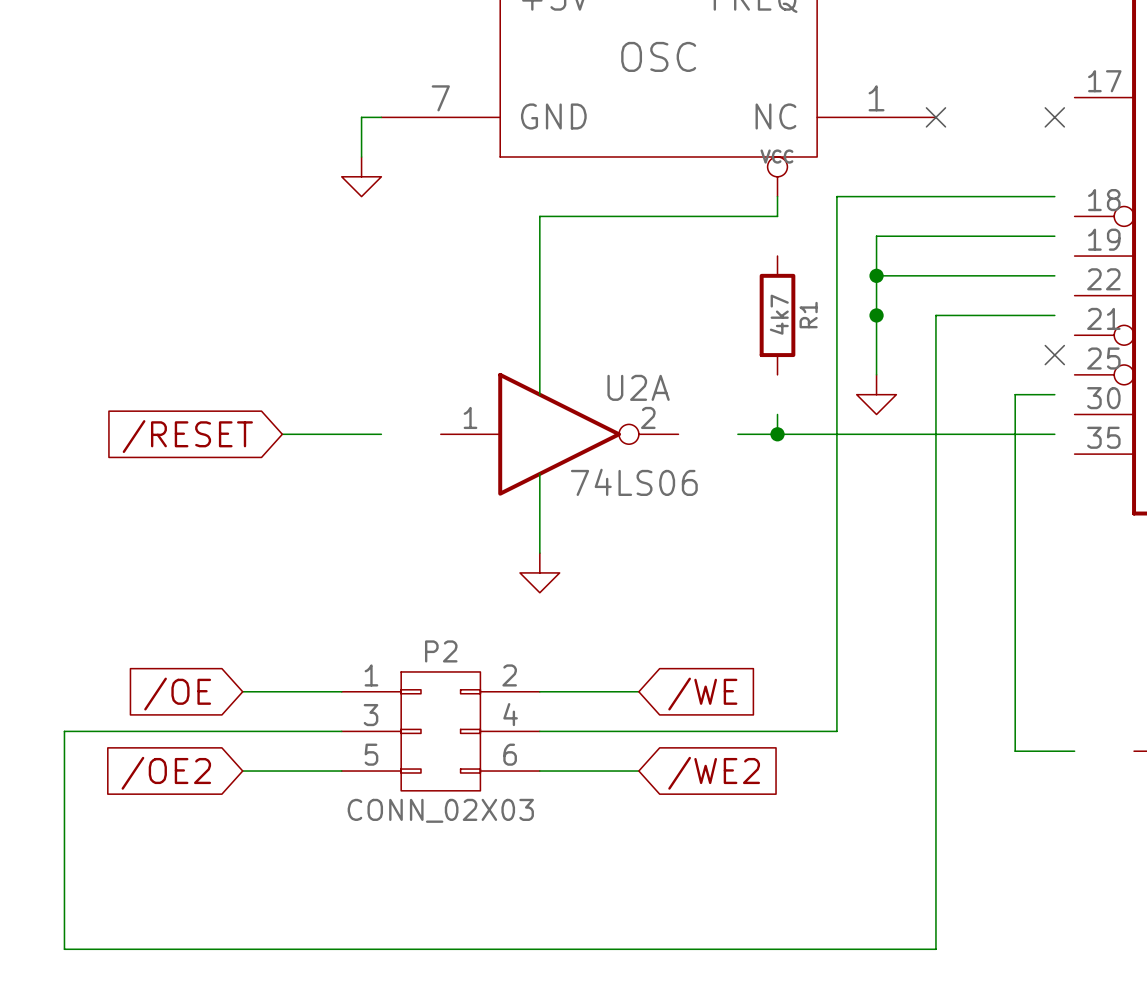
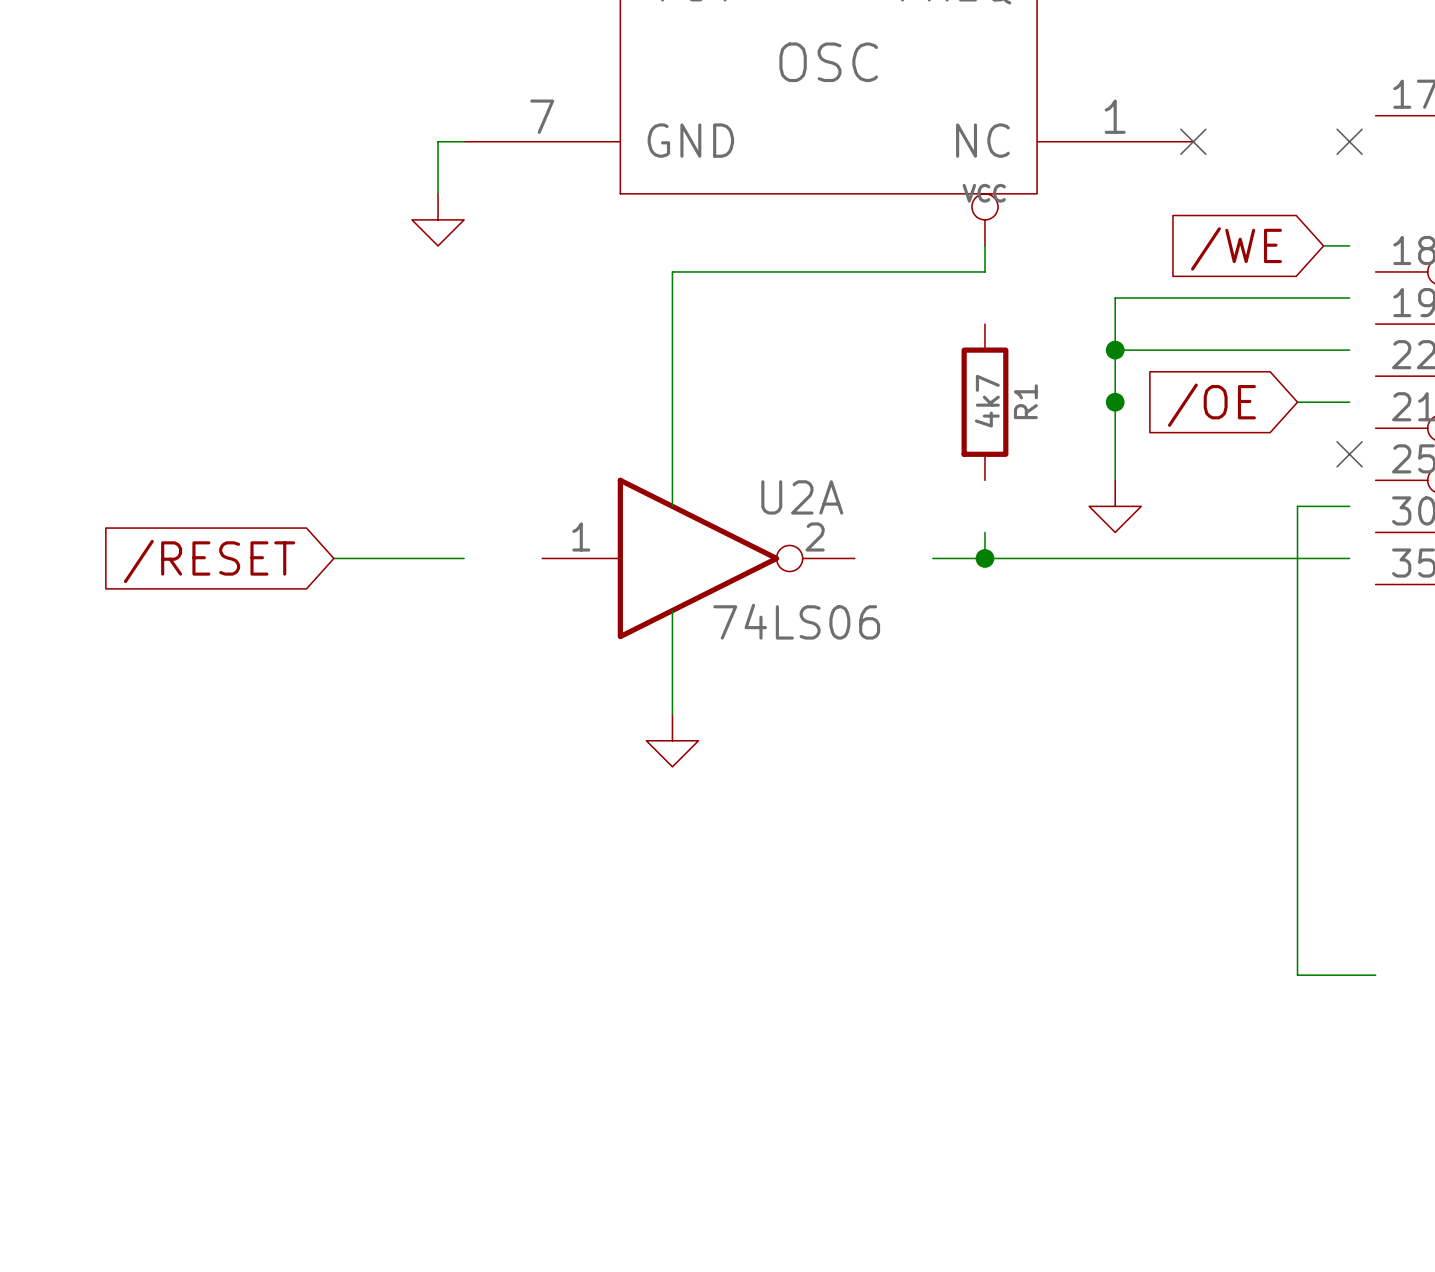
wire: (1035, 196) (836, 196) (836, 731) (539, 731) -> none
global label: none -> /WE (1236, 248)
wire: (1015, 315) (935, 315) (935, 949) (64, 949) (64, 731) (341, 731) -> none
global label: none -> /OE (1211, 405)
wire: (242, 691) (341, 691) -> none
wire: (539, 691) (638, 691) -> none
global label: /OE (177, 694) -> none
global label: /WE (702, 694) -> none
P2: CONN_02X03 (440, 731) -> none
wire: (242, 771) (341, 771) -> none
wire: (539, 771) (638, 771) -> none
global label: /OE2 (166, 773) -> none
global label: /WE2 (714, 773) -> none

